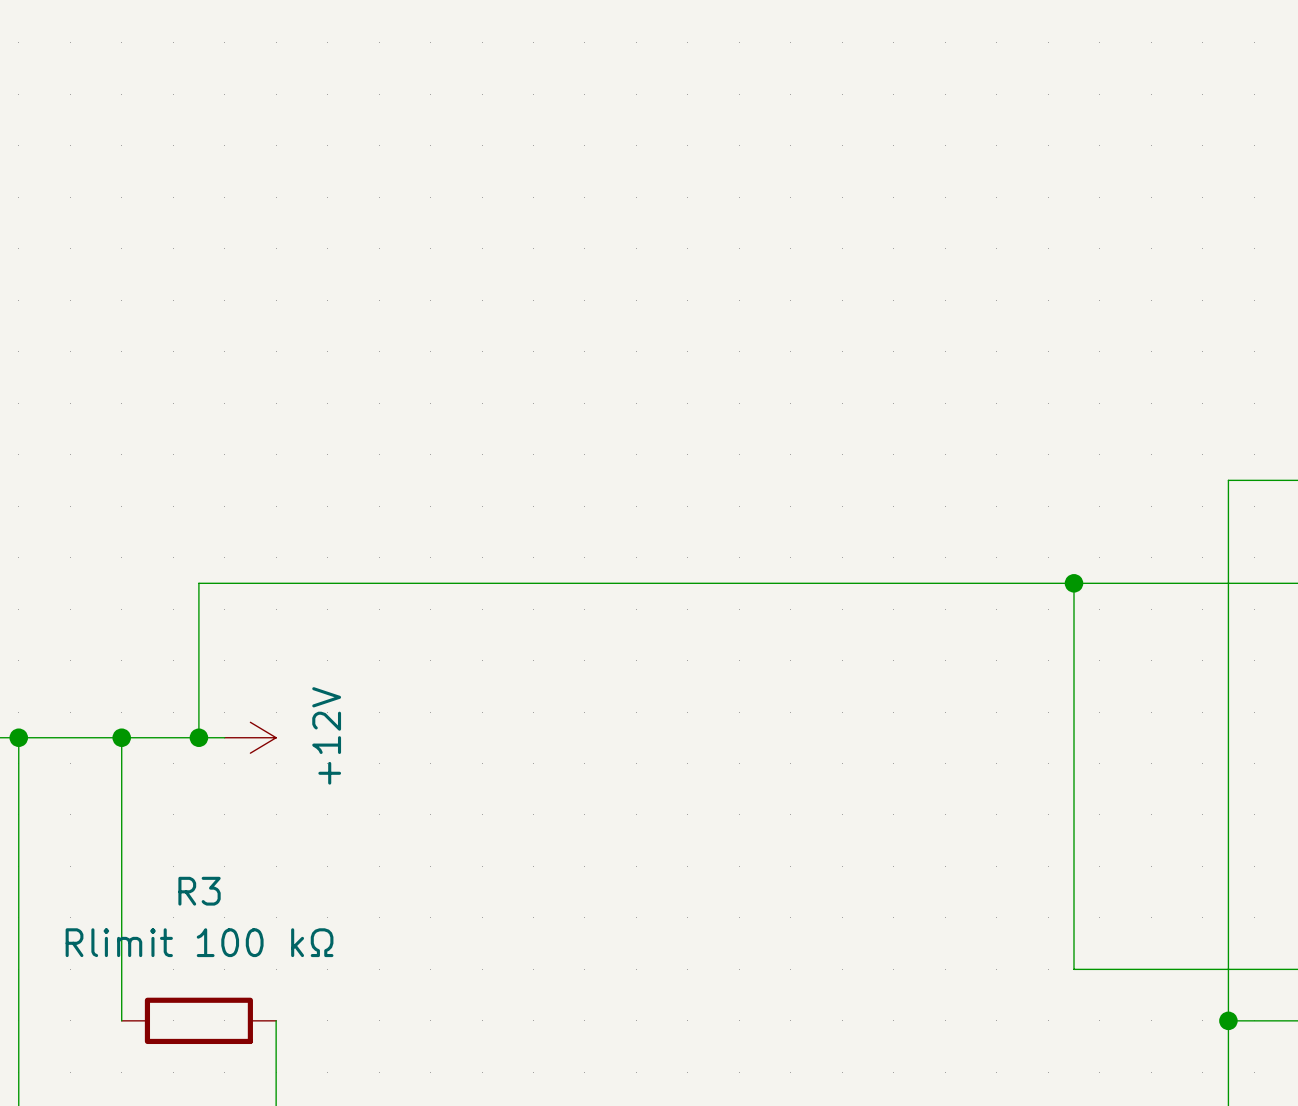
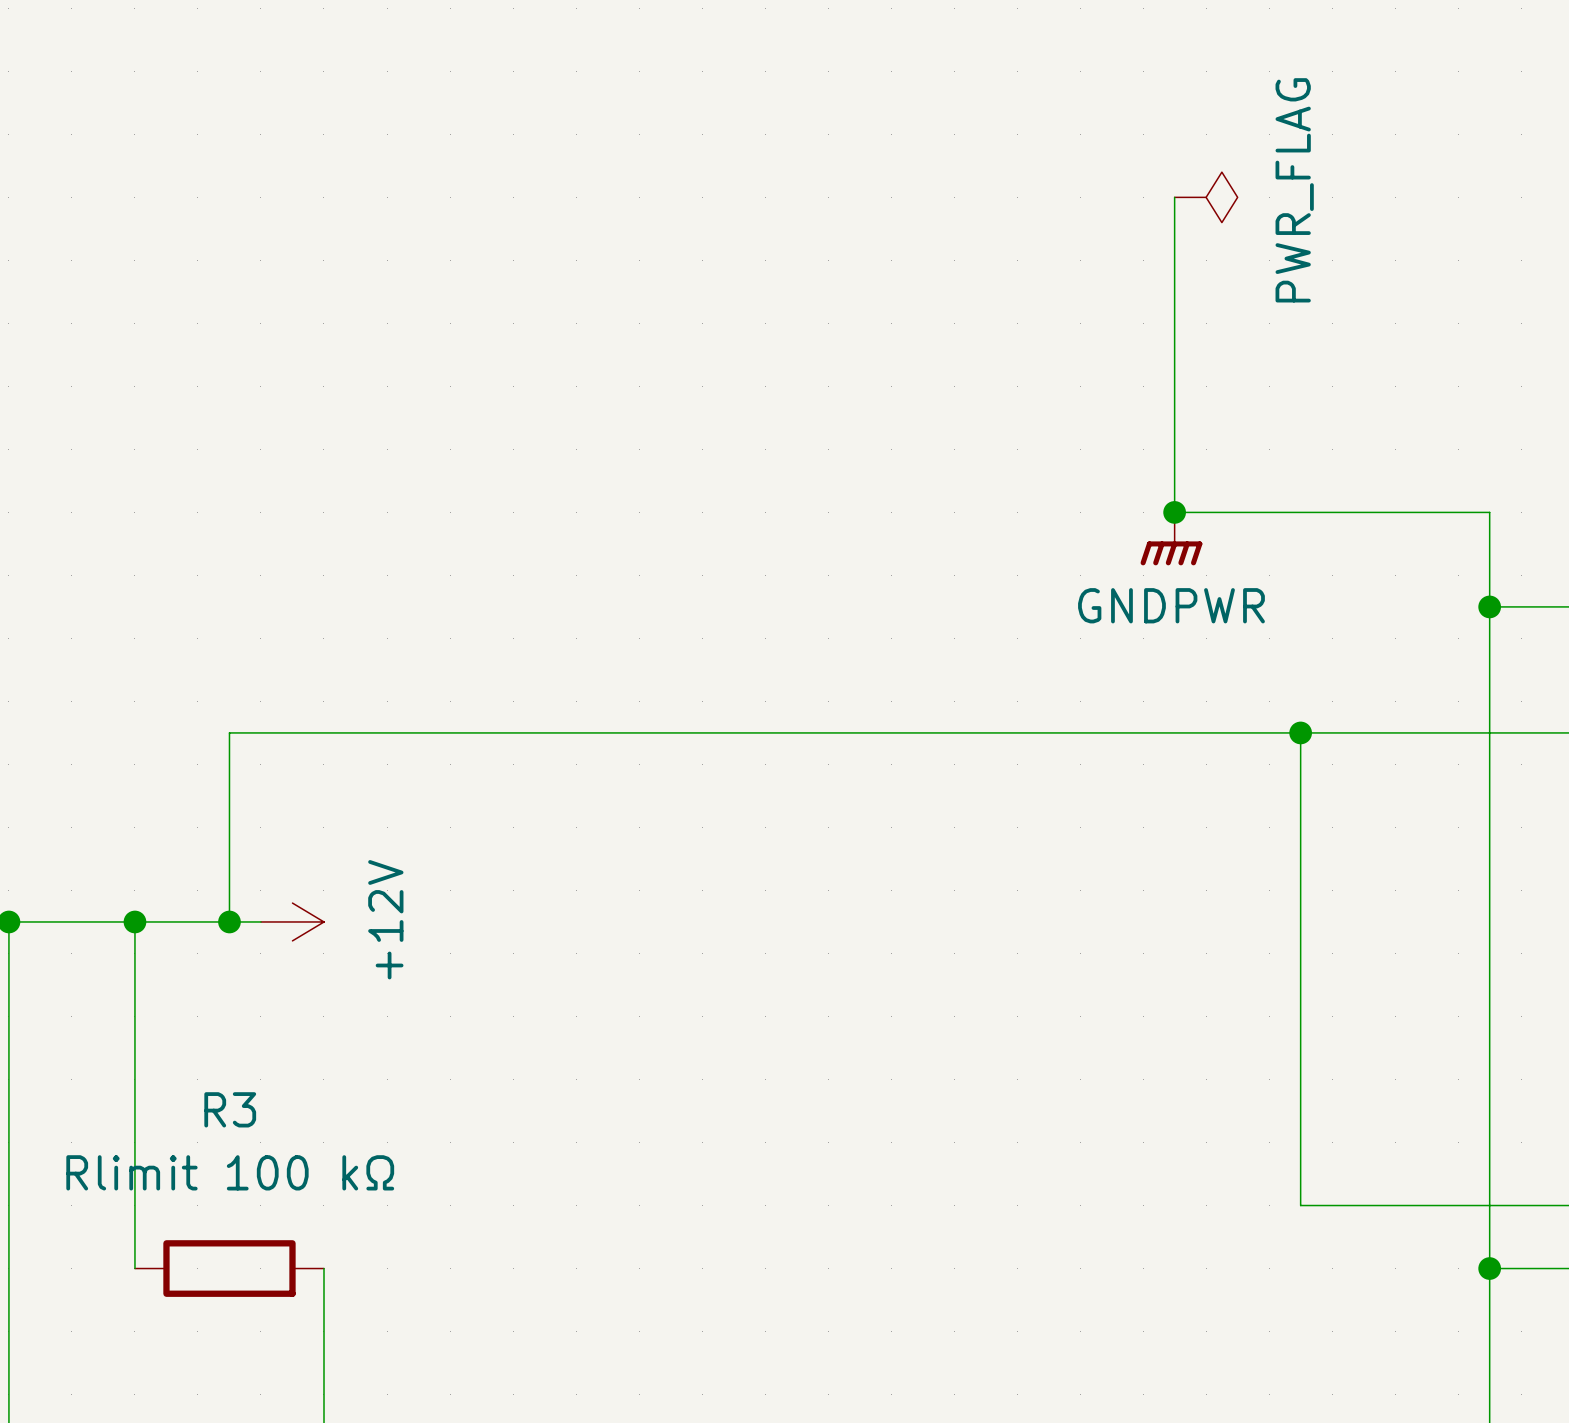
wire: none -> (1174, 197) (1174, 512) (1489, 512) (1489, 606)
power symbol: none -> PWR_FLAG (1206, 197)
junction: none -> (1174, 512)
power symbol: none -> GNDPWR (1171, 538)
junction: none -> (1489, 606)

